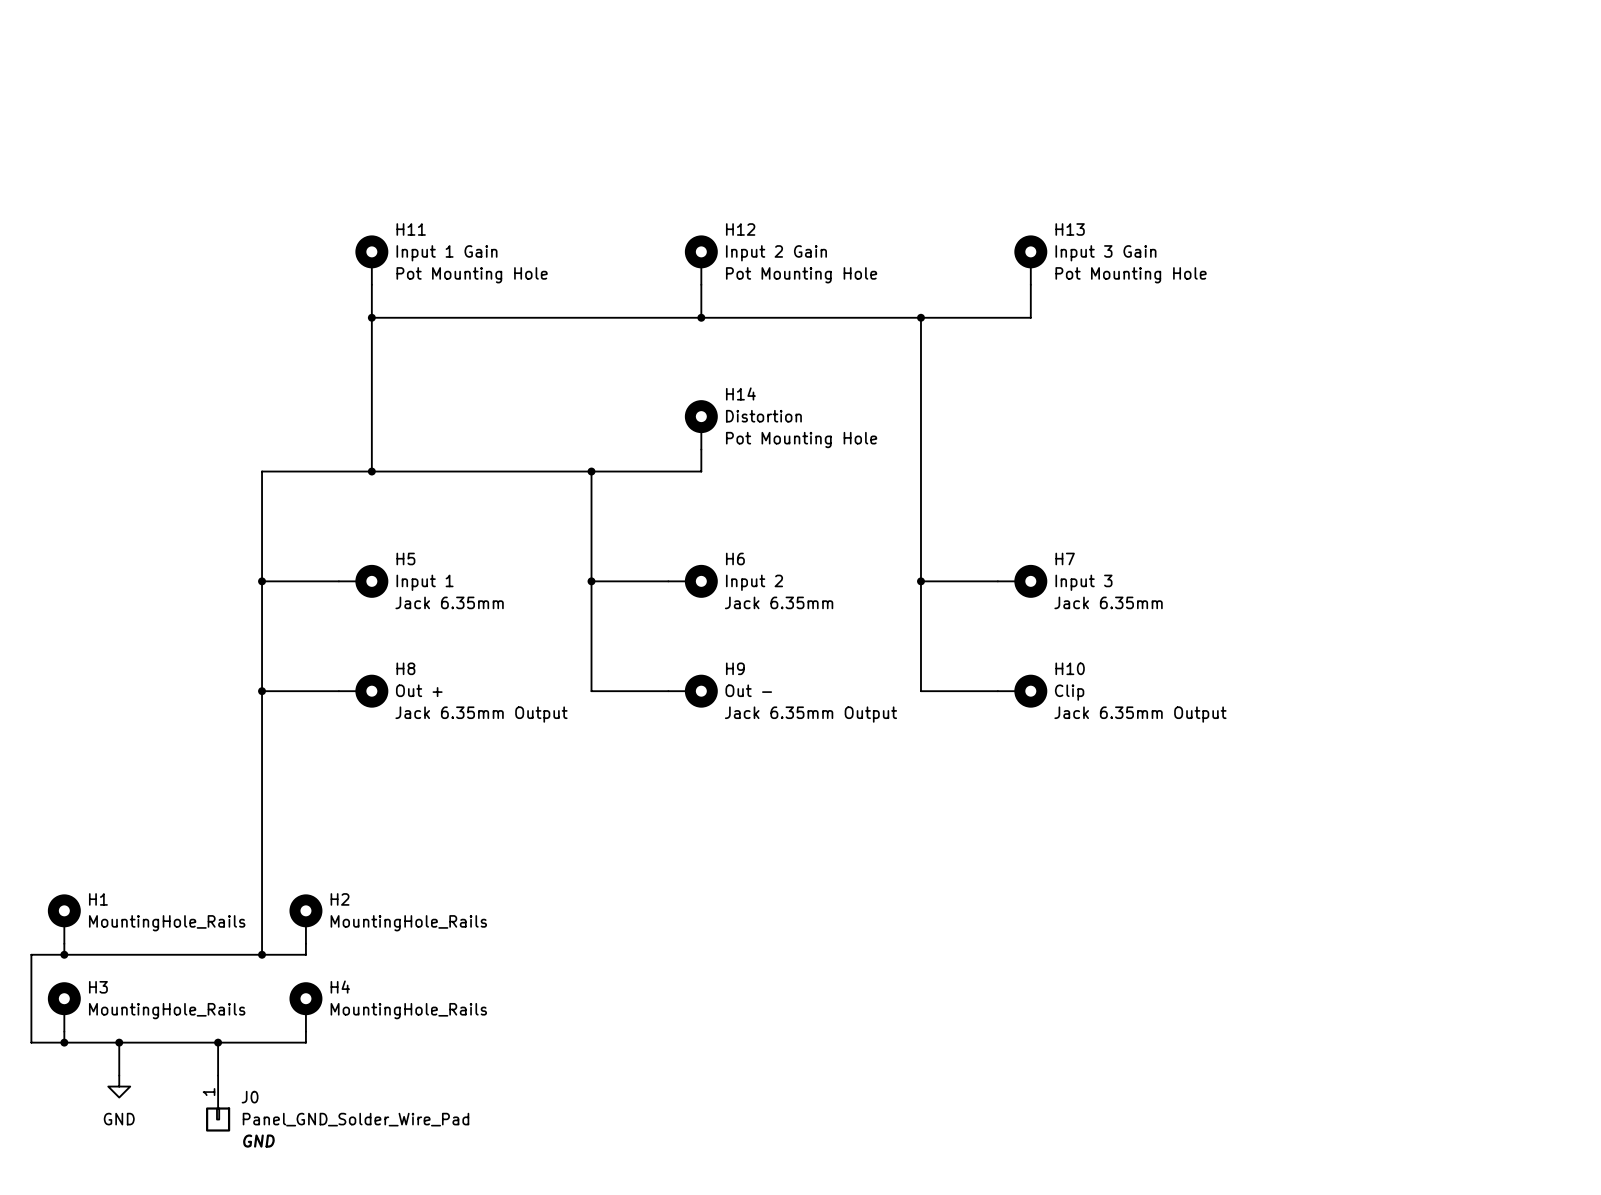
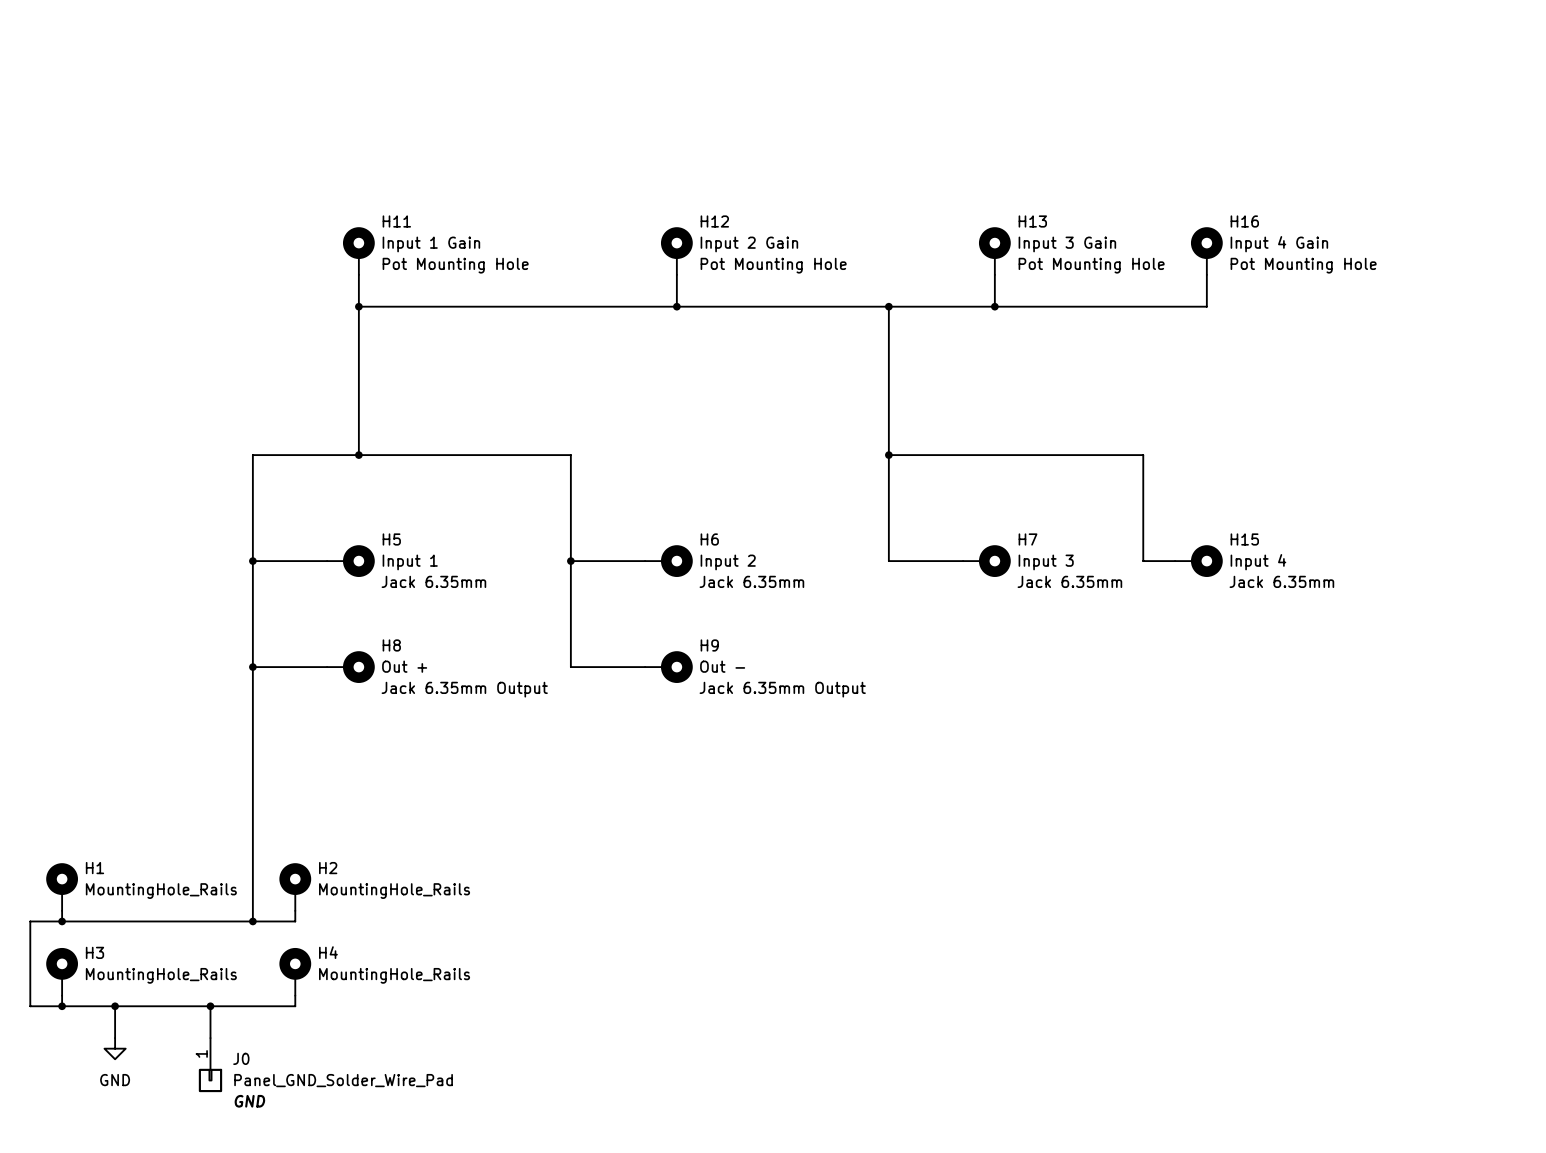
H16: none -> Input 4 Gain (1206, 251)
wire: none -> (1206, 274) (1206, 306) (994, 306)
junction: none -> (994, 306)
H14: Distortion (701, 424) -> none
wire: (701, 449) (701, 471) (591, 471) -> none
junction: (591, 471) -> none
wire: none -> (888, 455) (1143, 455) (1143, 561) (1175, 561)
junction: none -> (888, 455)
wire: (920, 581) (920, 691) (997, 691) -> none
junction: (920, 581) -> none
H15: none -> Input 4 (1198, 561)
H10: Clip (1022, 691) -> none

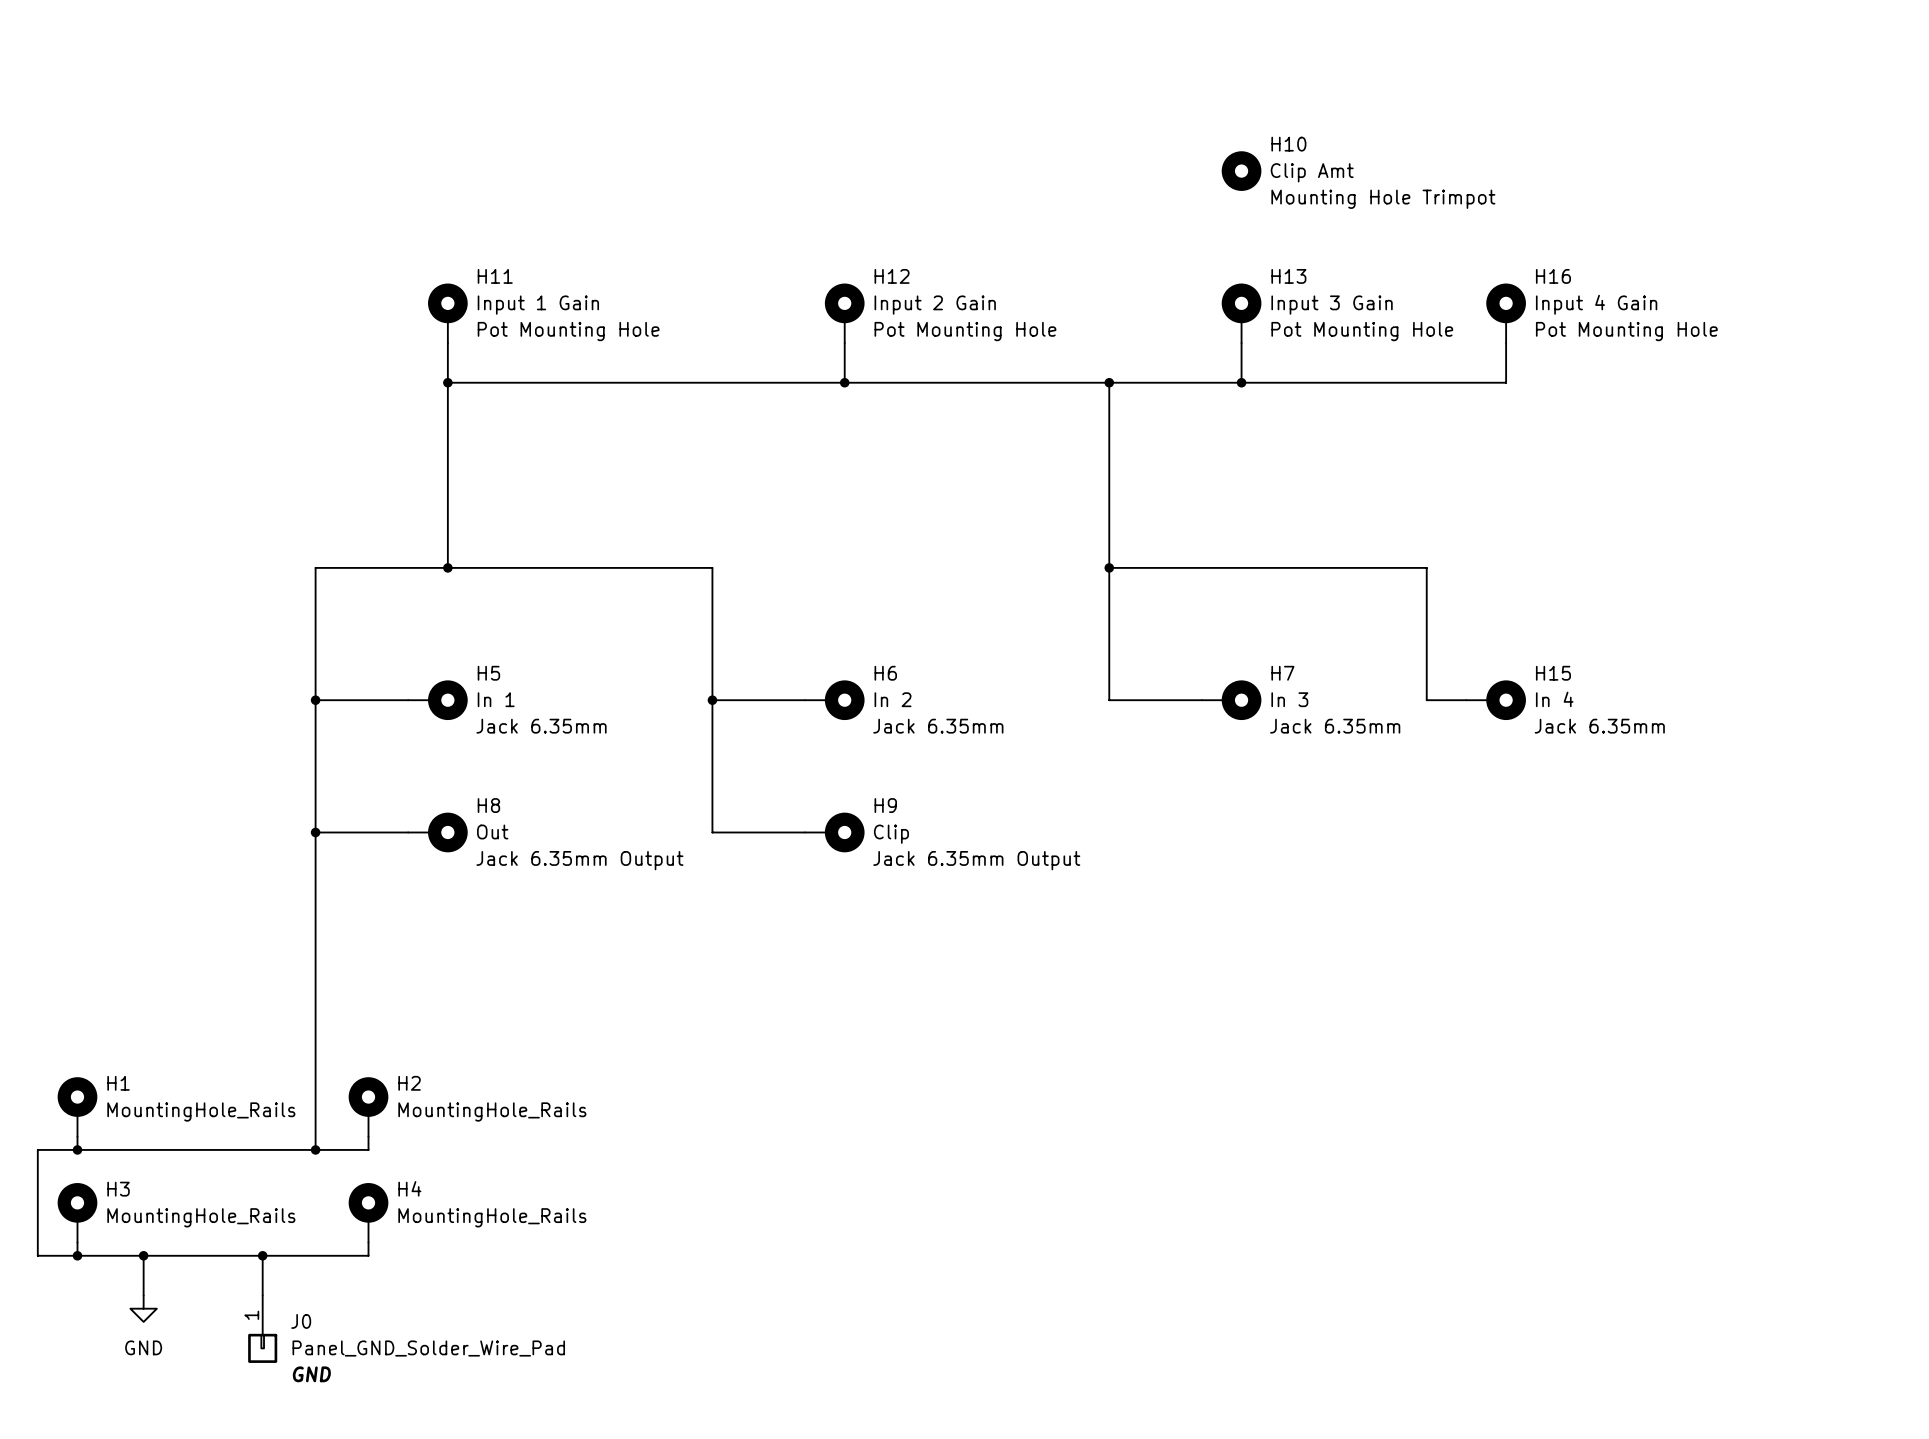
H10: none -> Clip Amt (1241, 171)
H5 value: Input 1 (410, 562) -> In 1 (496, 699)
H6 value: Input 2 (728, 562) -> In 2 (893, 699)
H7 value: Input 3 (1046, 562) -> In 3 (1289, 699)
H15 value: Input 4 (1258, 562) -> In 4 (1554, 699)
H8 value: Out + (404, 666) -> Out (492, 831)
H9 value: Out - (722, 666) -> Clip (891, 834)

